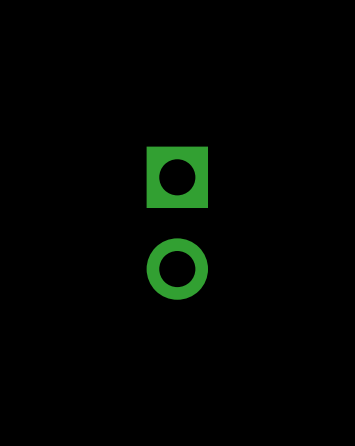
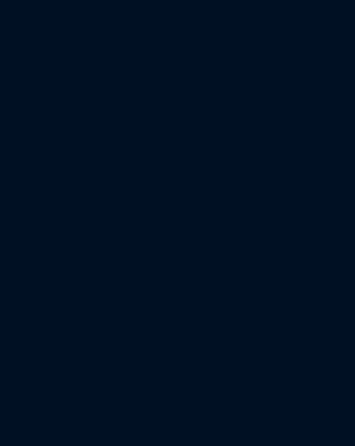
part: (177, 223) -> none

